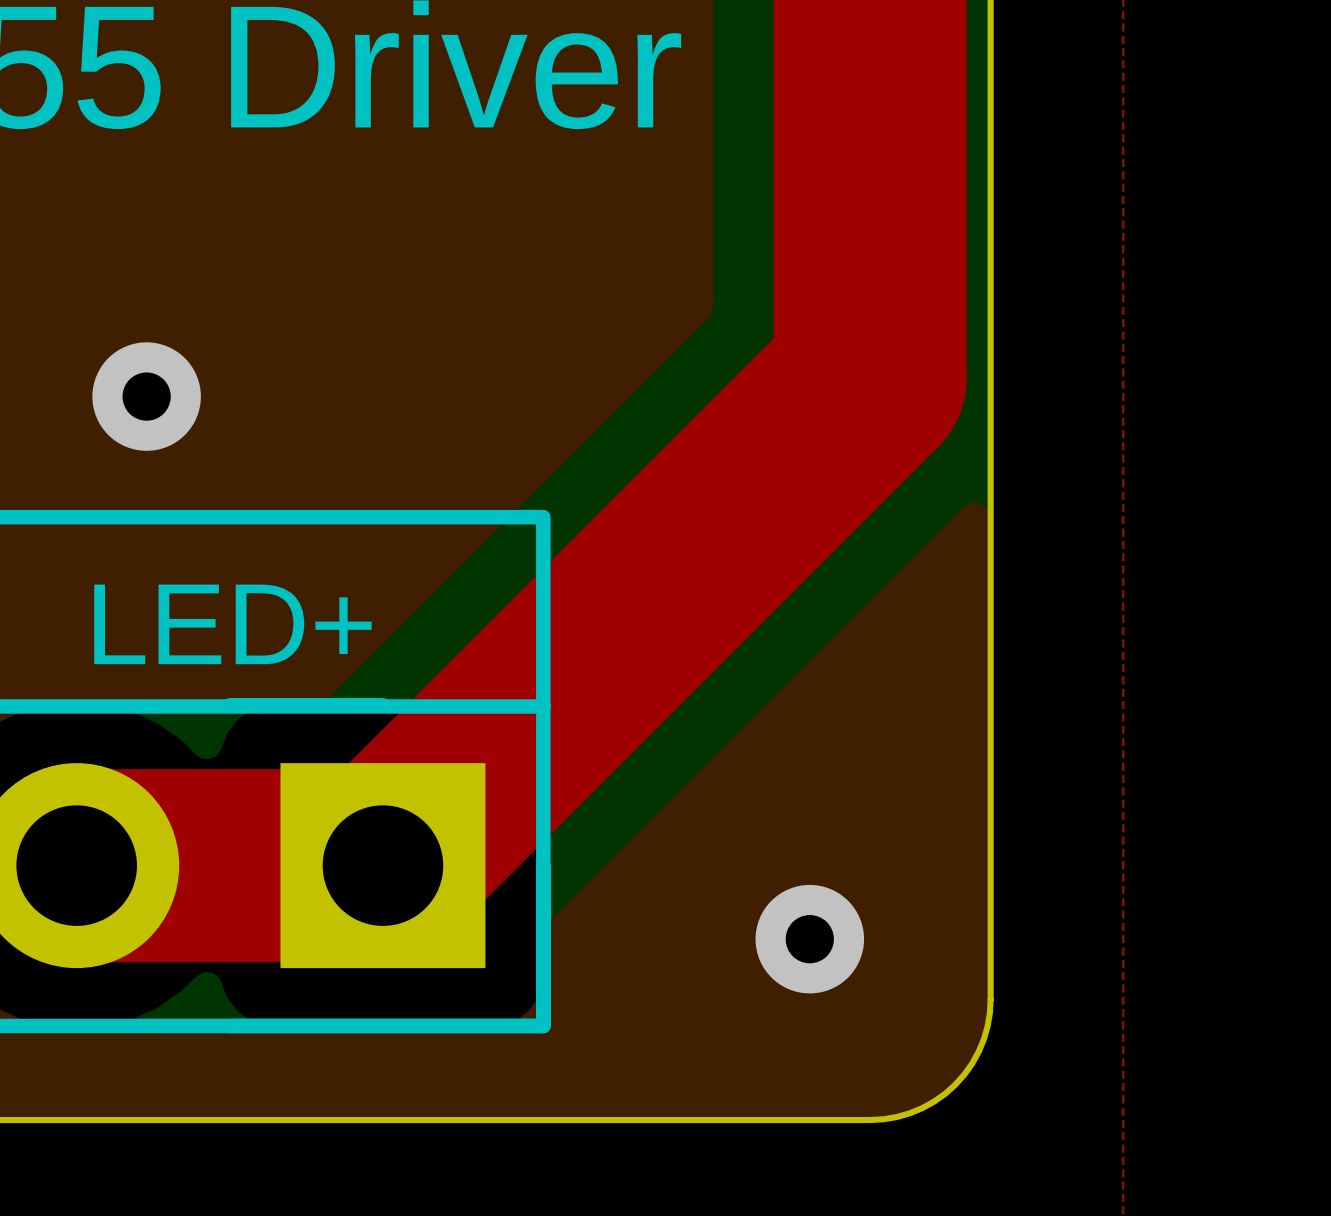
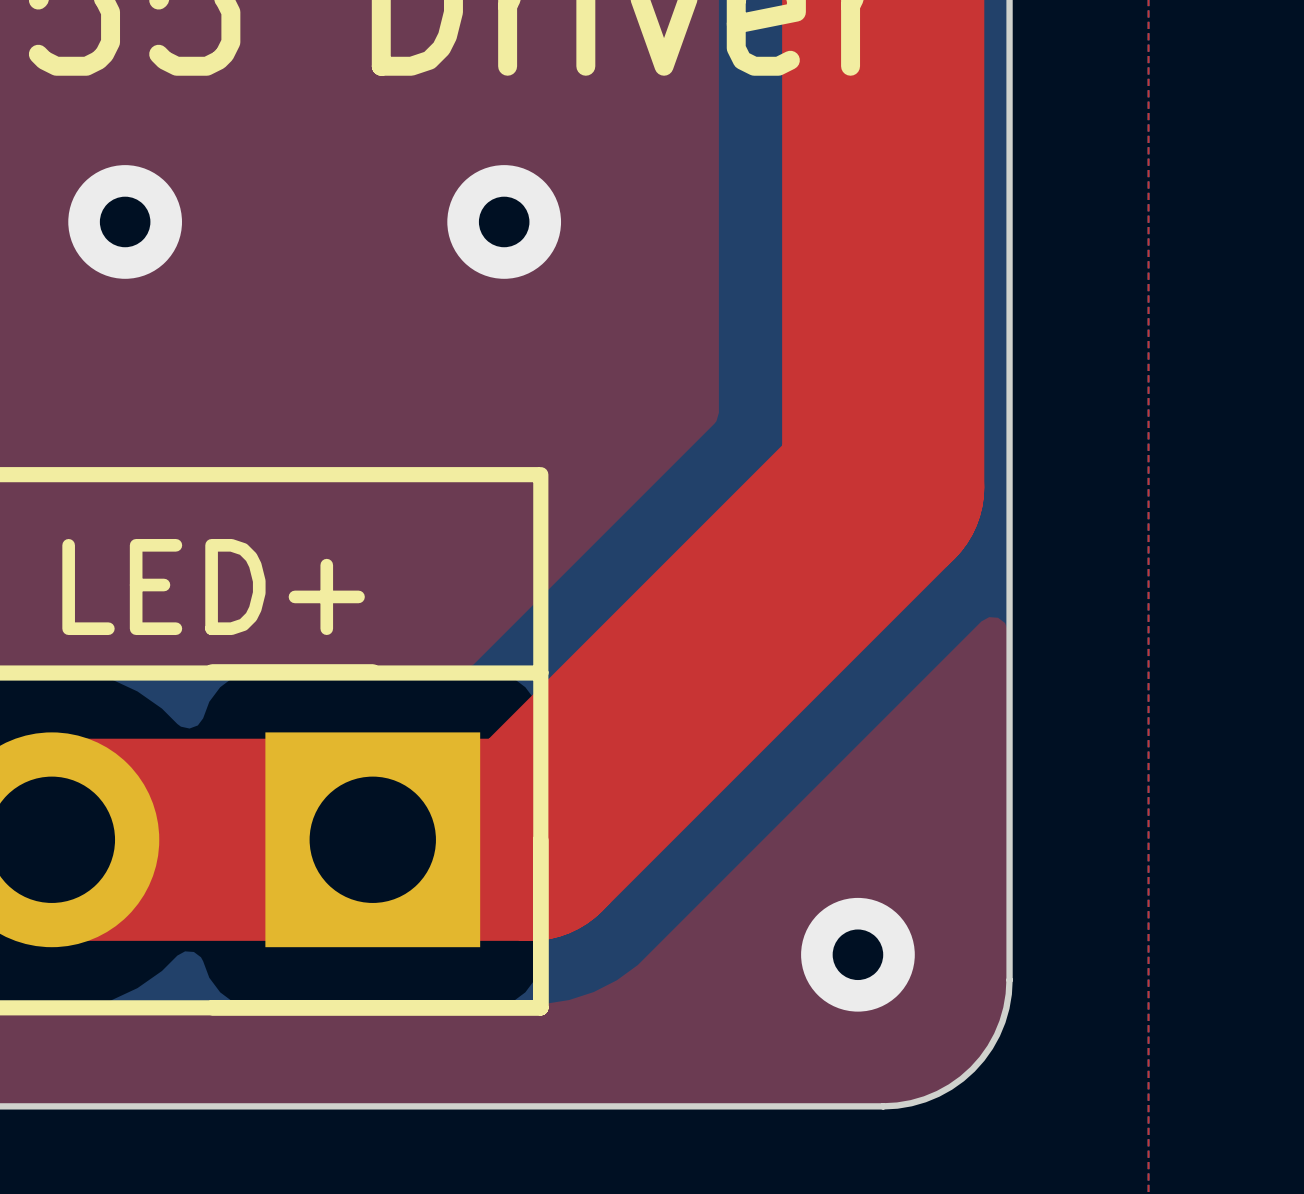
via: none -> (504, 221)
top track: (870, 378) (382, 865) -> (883, 329) (883, 487) (530, 839) (372, 839)
via position: (146, 396) -> (125, 221)
via position: (809, 939) -> (857, 954)

